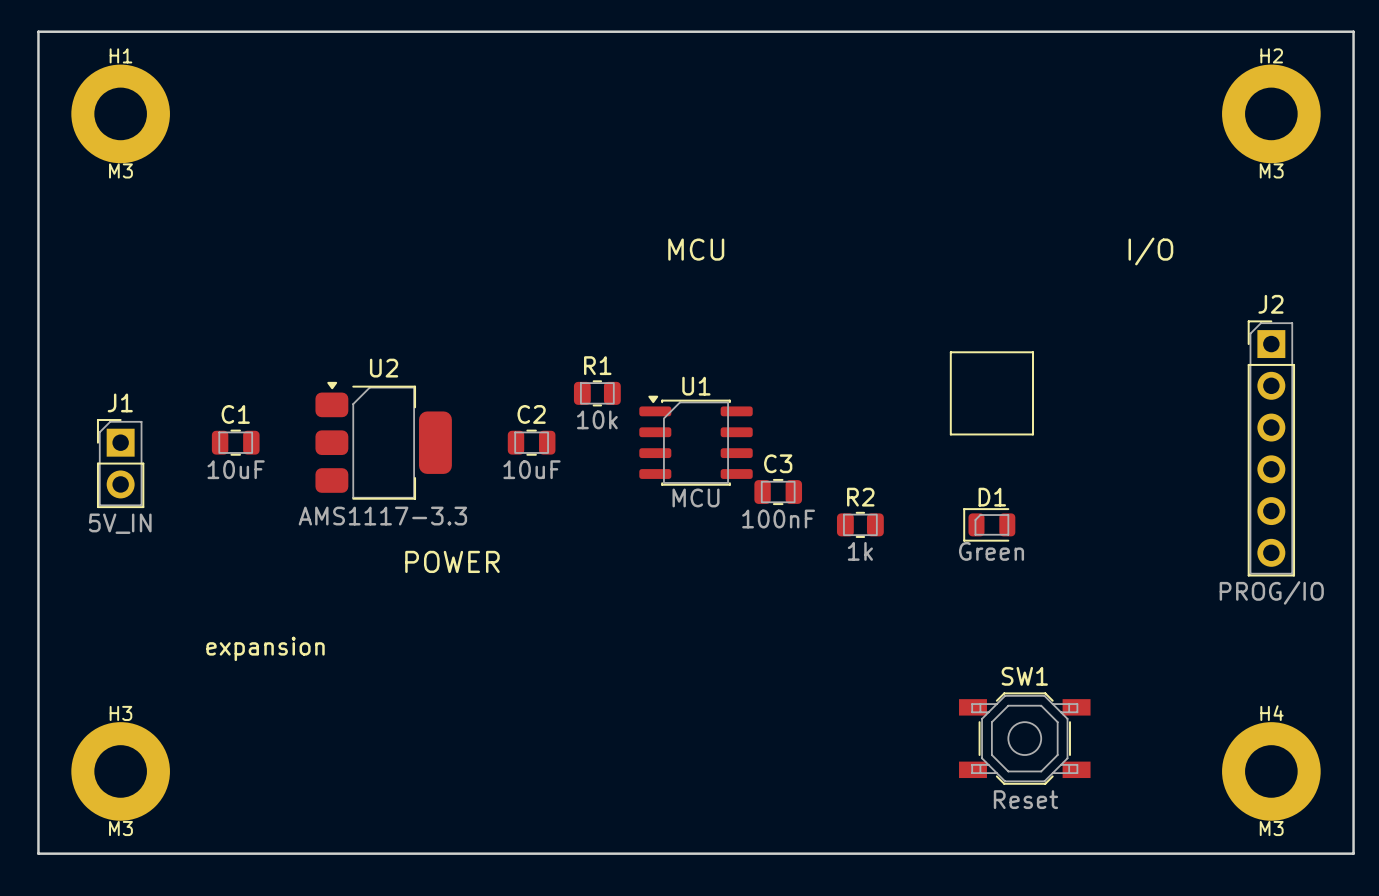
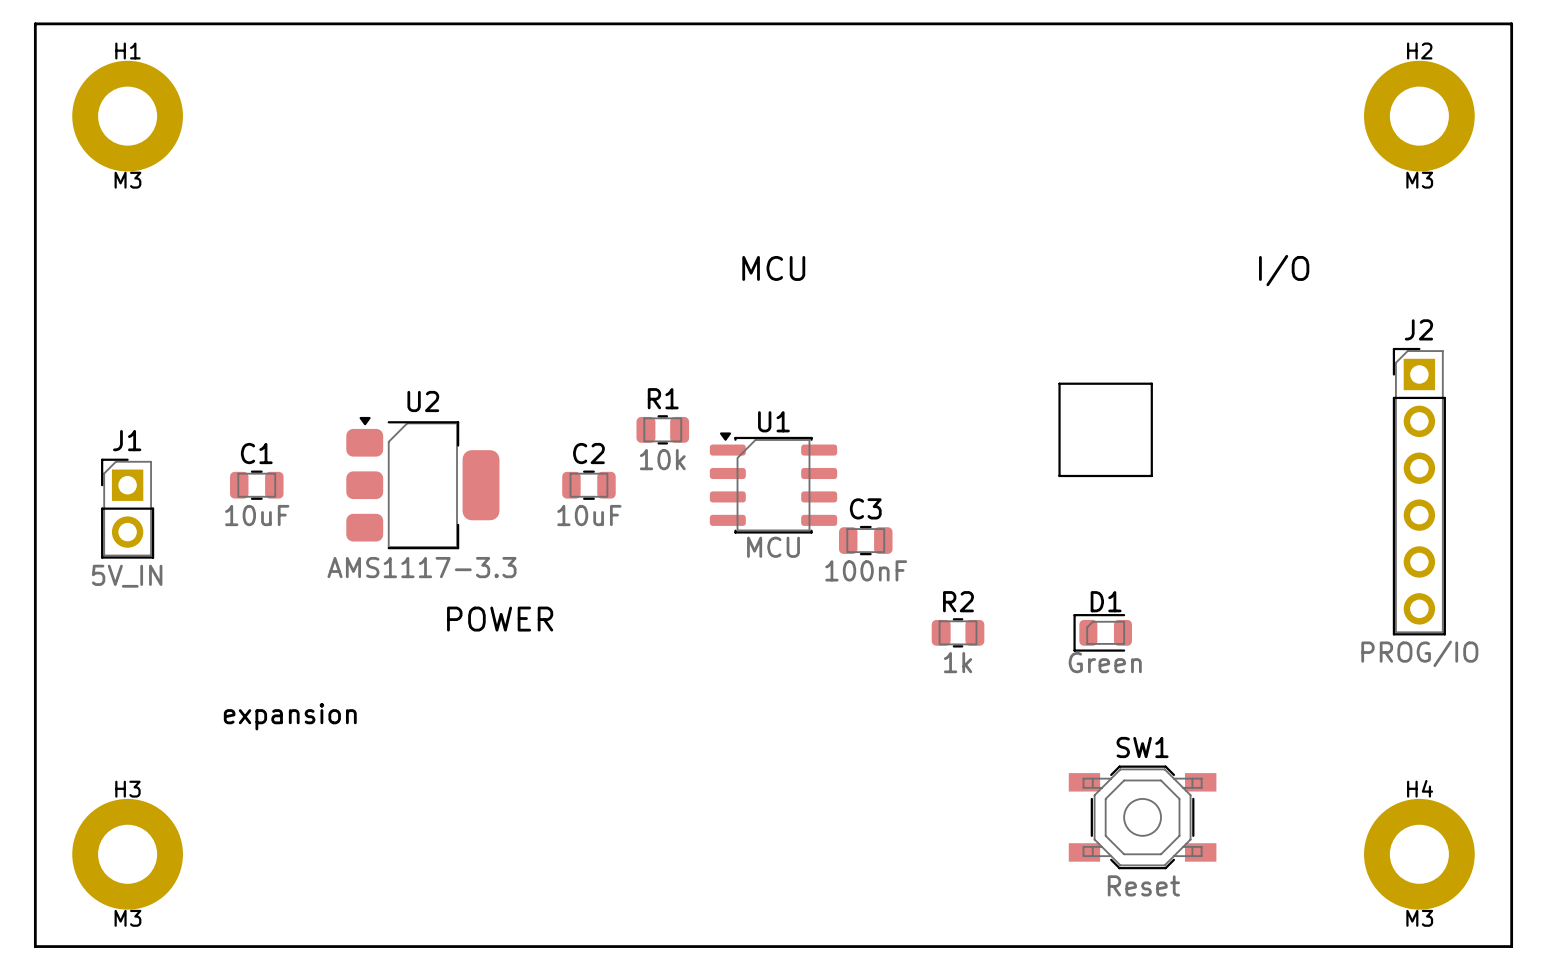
R2 position: (860, 524) -> (958, 632)
D1 position: (989, 524) -> (1102, 632)

